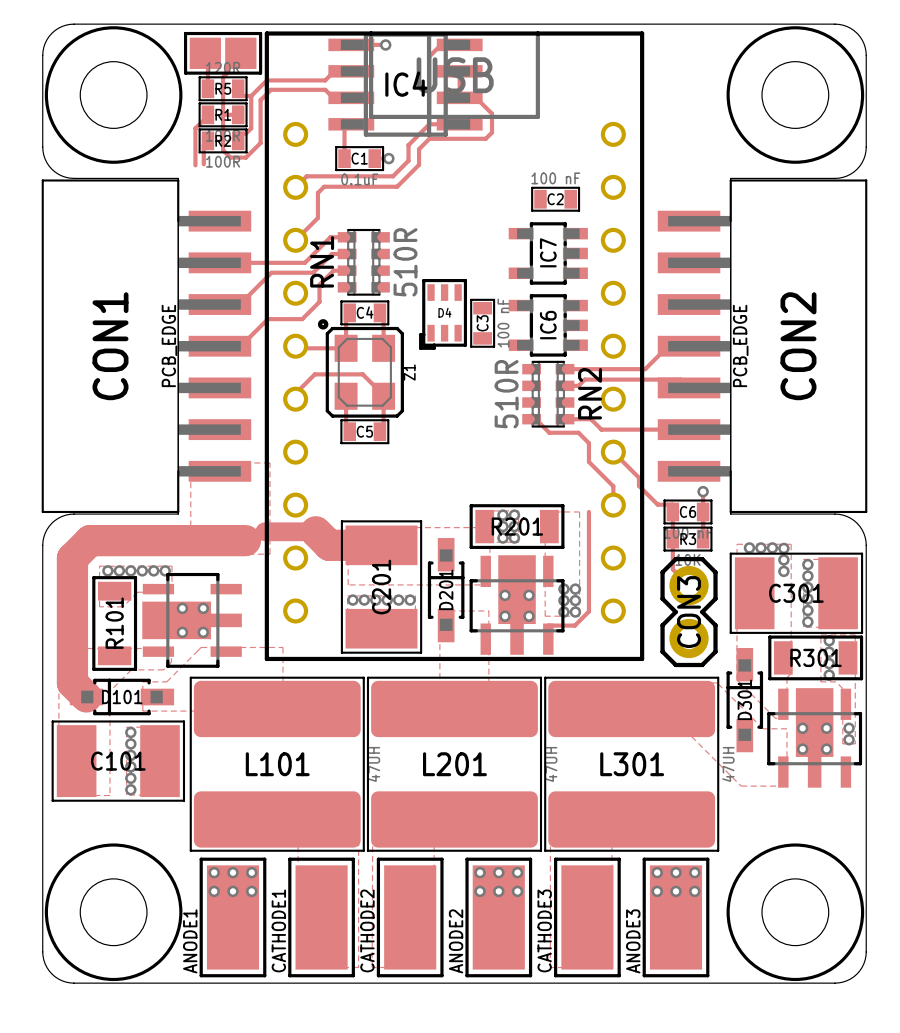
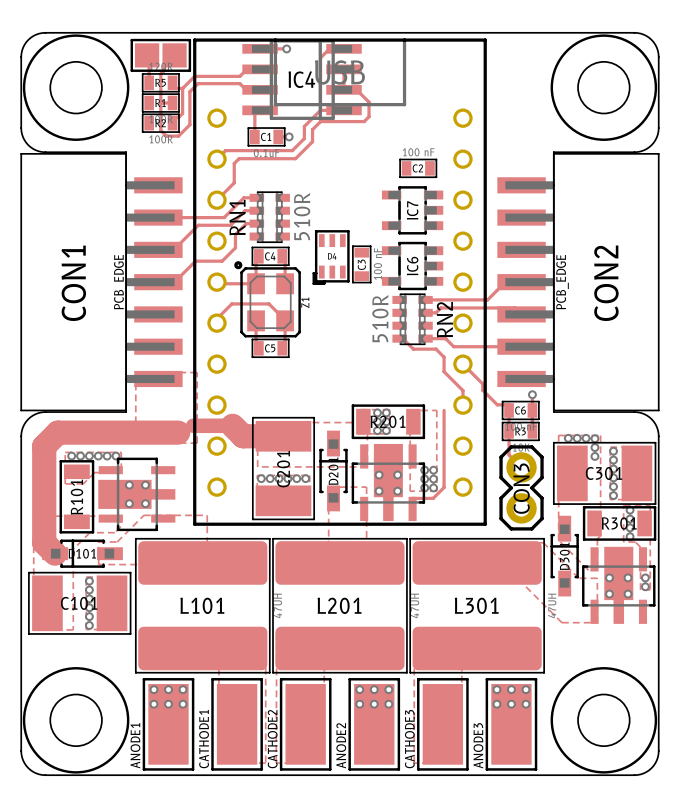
track: (207, 114) (195, 128) (195, 165) -> none
track: (207, 140) (203, 145) (203, 164) -> none

